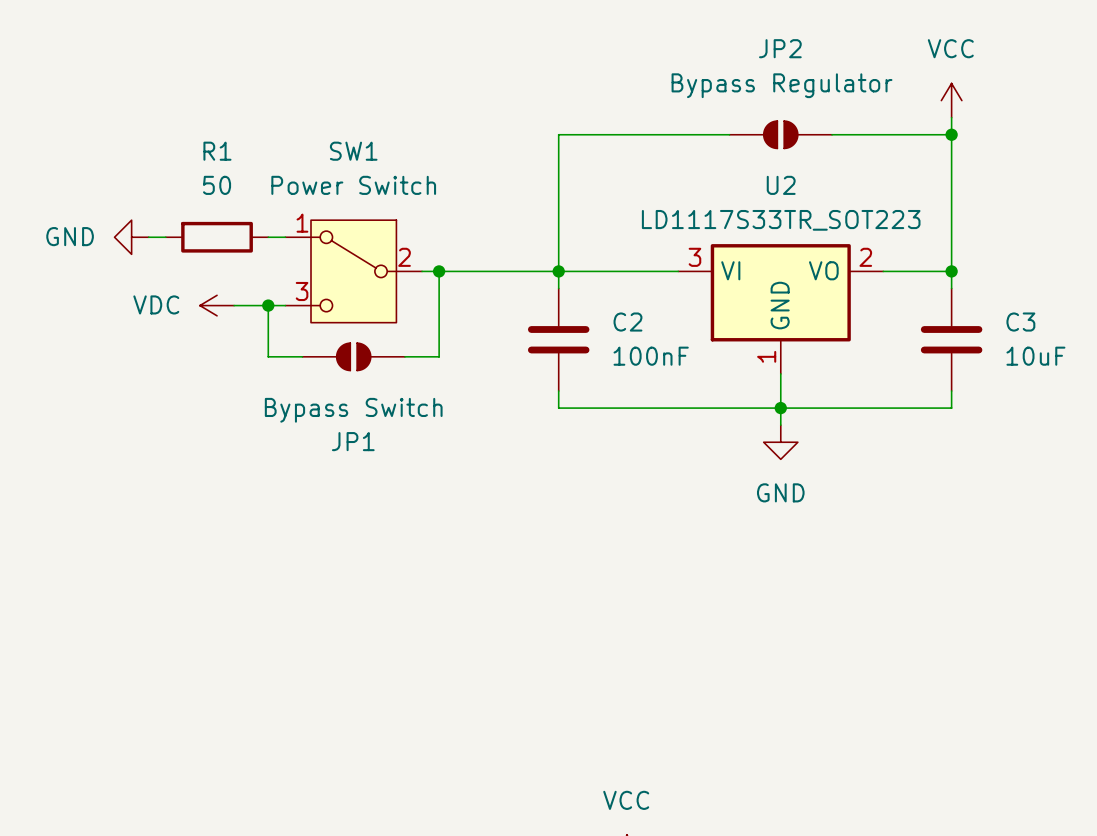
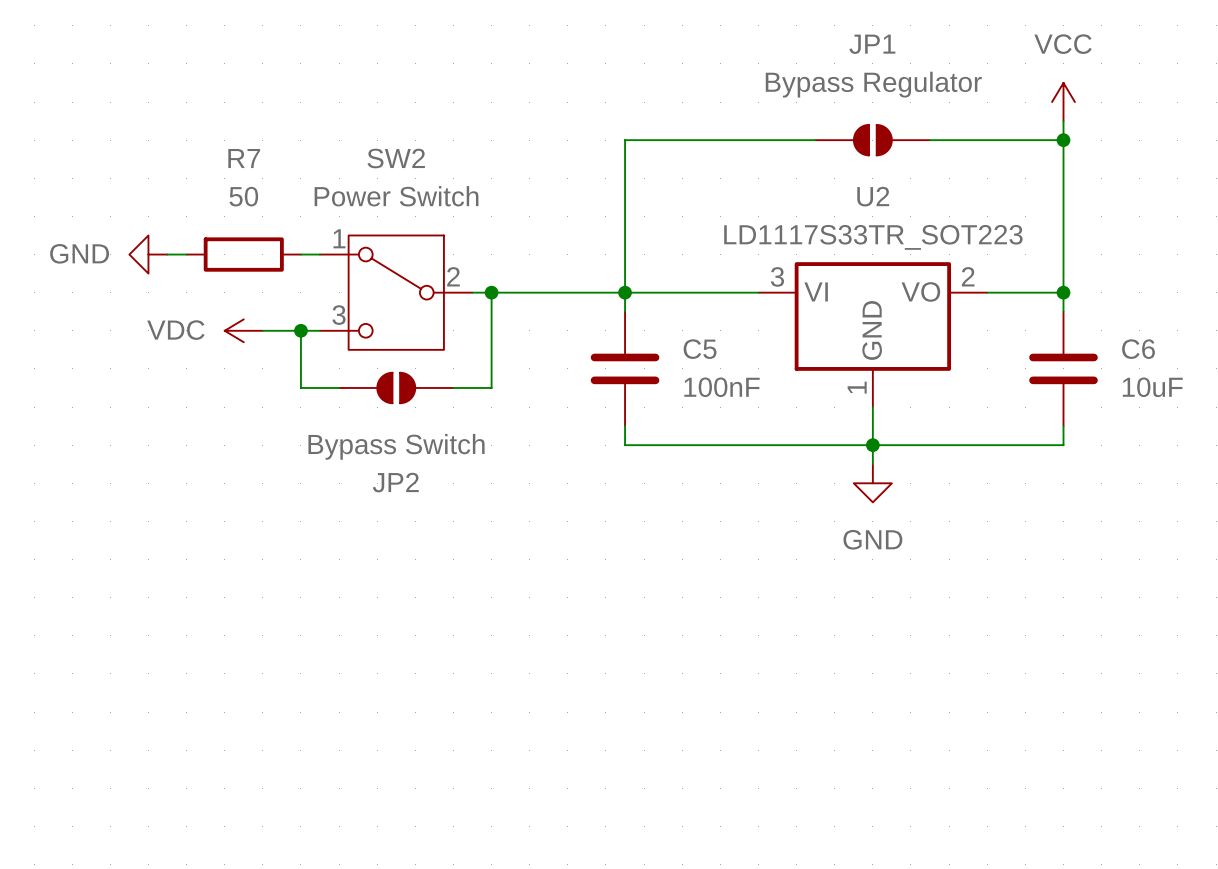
JP2 name: JP2 (780, 48) -> JP1 (872, 44)
R1 name: R1 (217, 151) -> R7 (244, 158)
SW1 name: SW1 (353, 151) -> SW2 (396, 158)
C2 name: C2 (627, 322) -> C5 (700, 349)
C3 name: C3 (1020, 322) -> C6 (1138, 349)
JP1 name: JP1 (353, 441) -> JP2 (395, 482)

